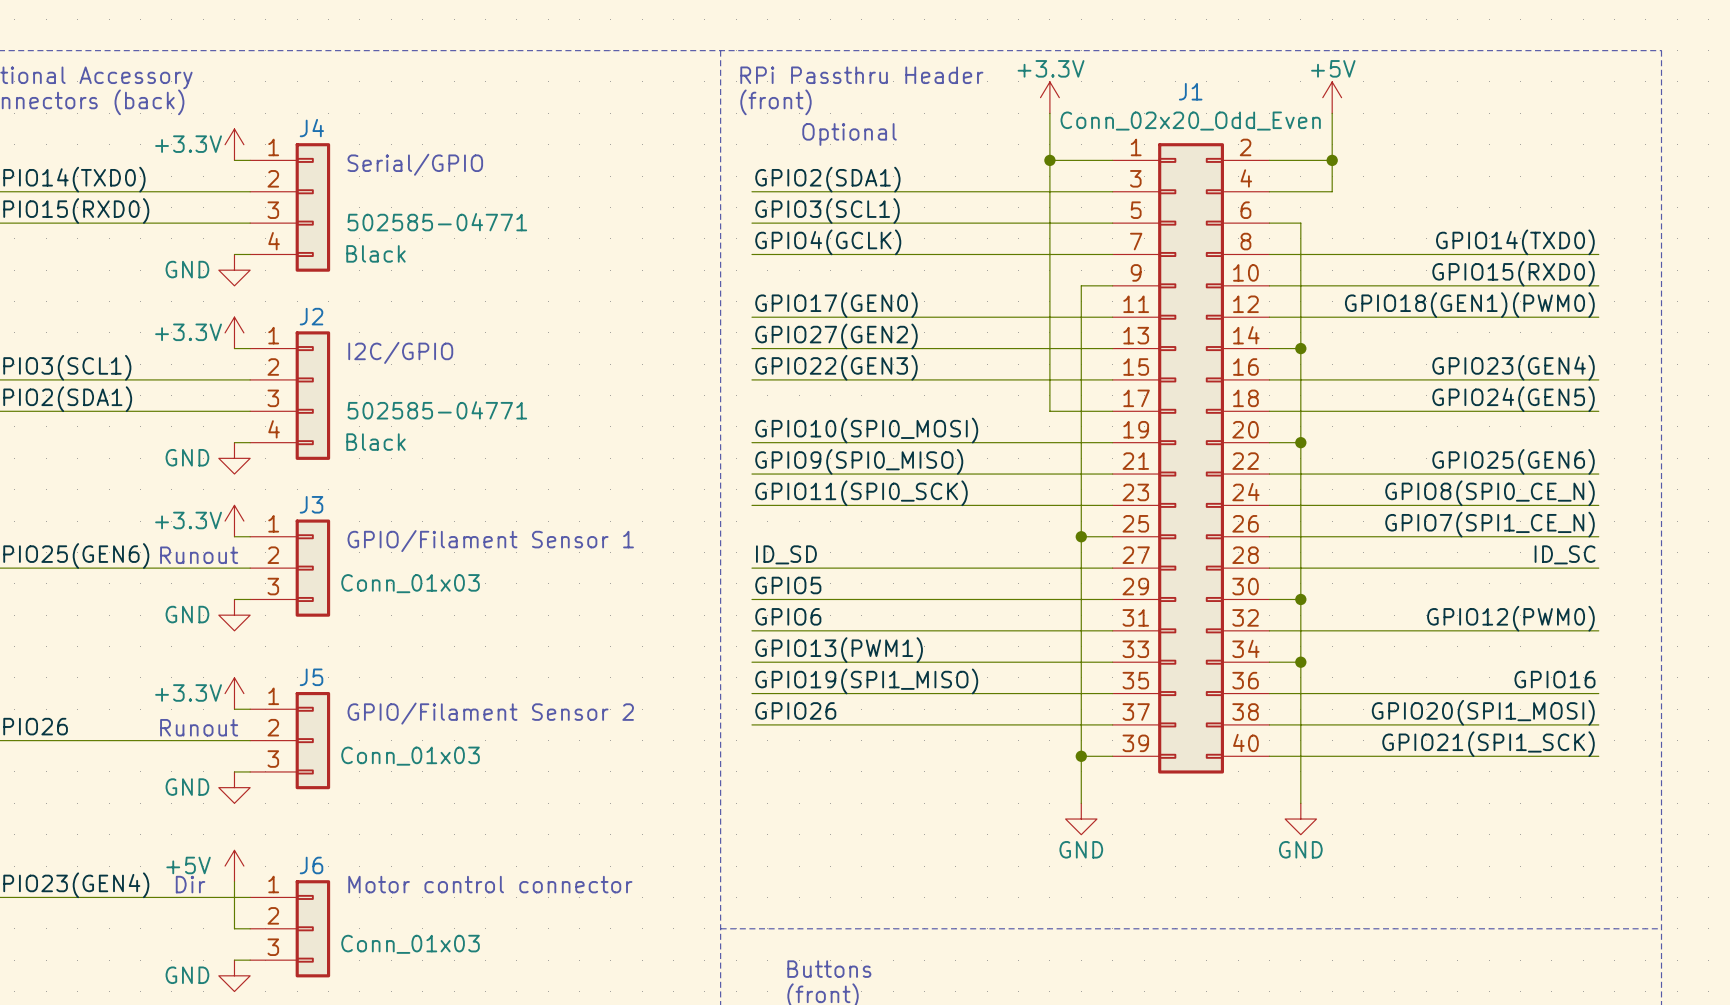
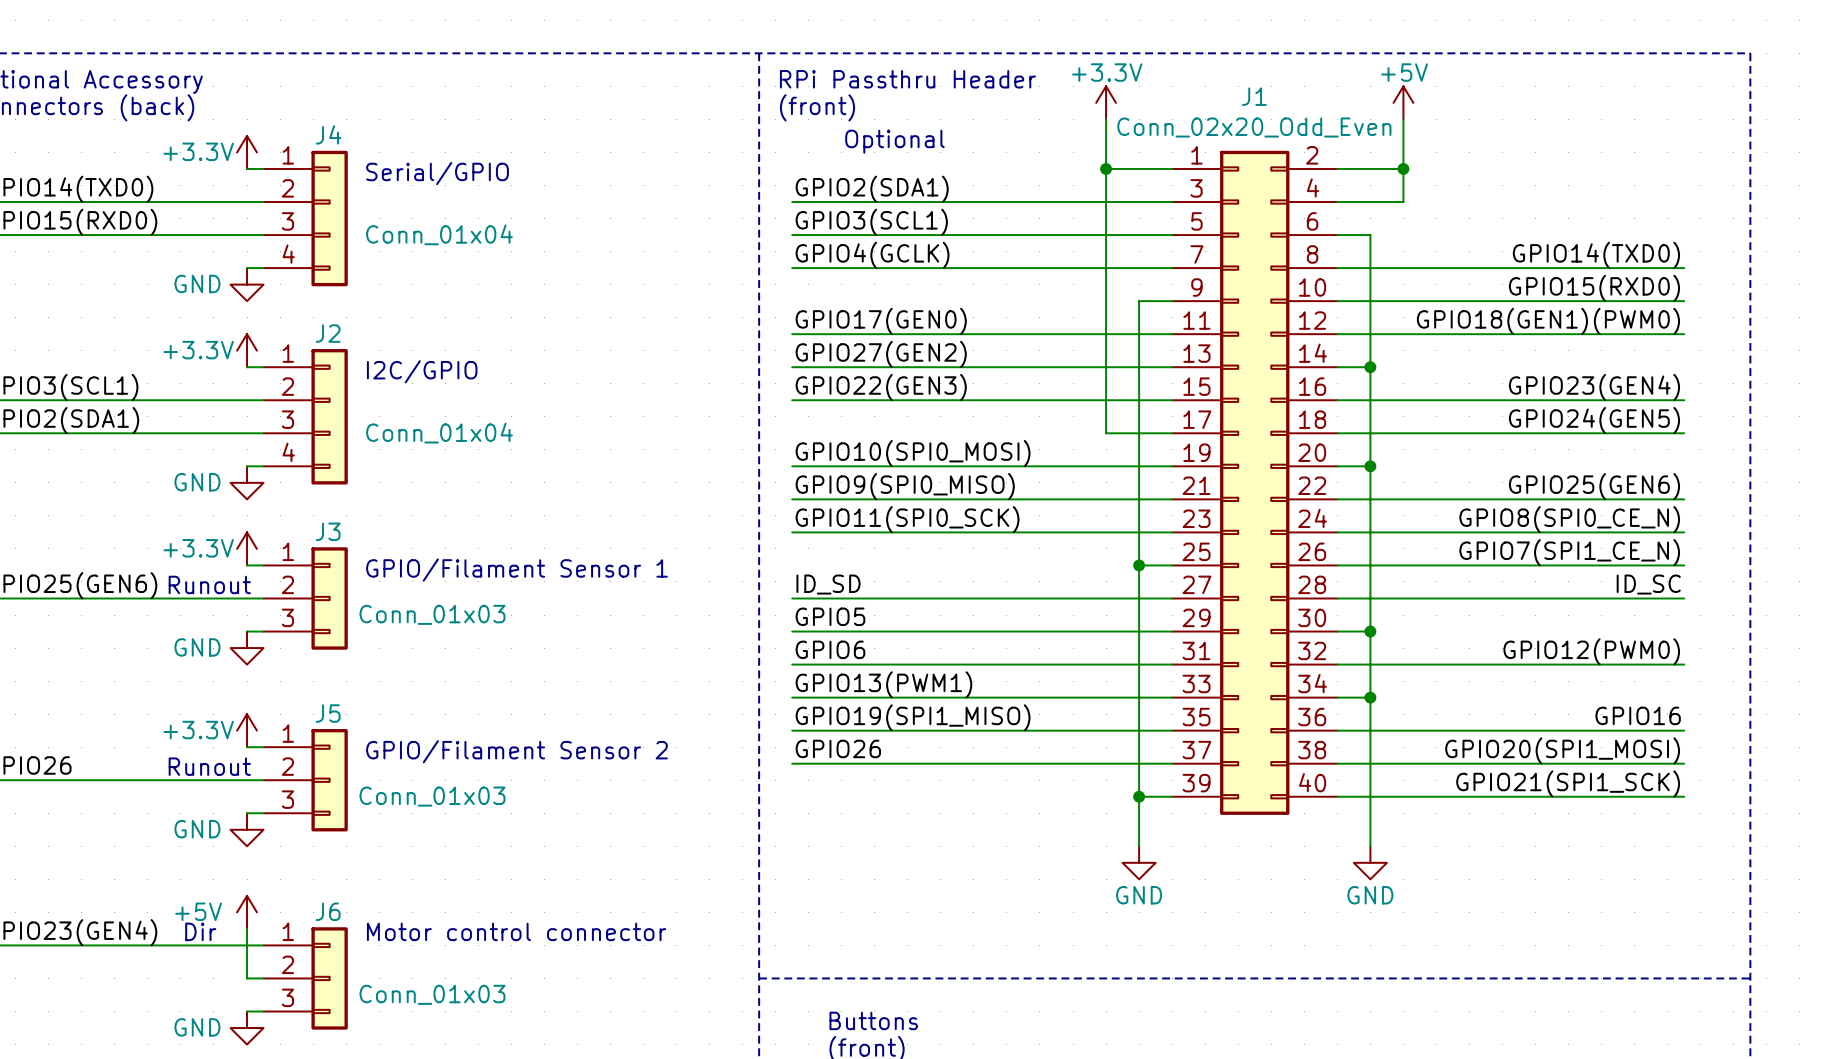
J4 value: 502585-04771 (437, 222) -> Conn_01x04 (439, 234)
J4 text: Black (375, 253) -> none
J2 value: 502585-04771 (437, 410) -> Conn_01x04 (439, 433)
J2 text: Black (375, 442) -> none

